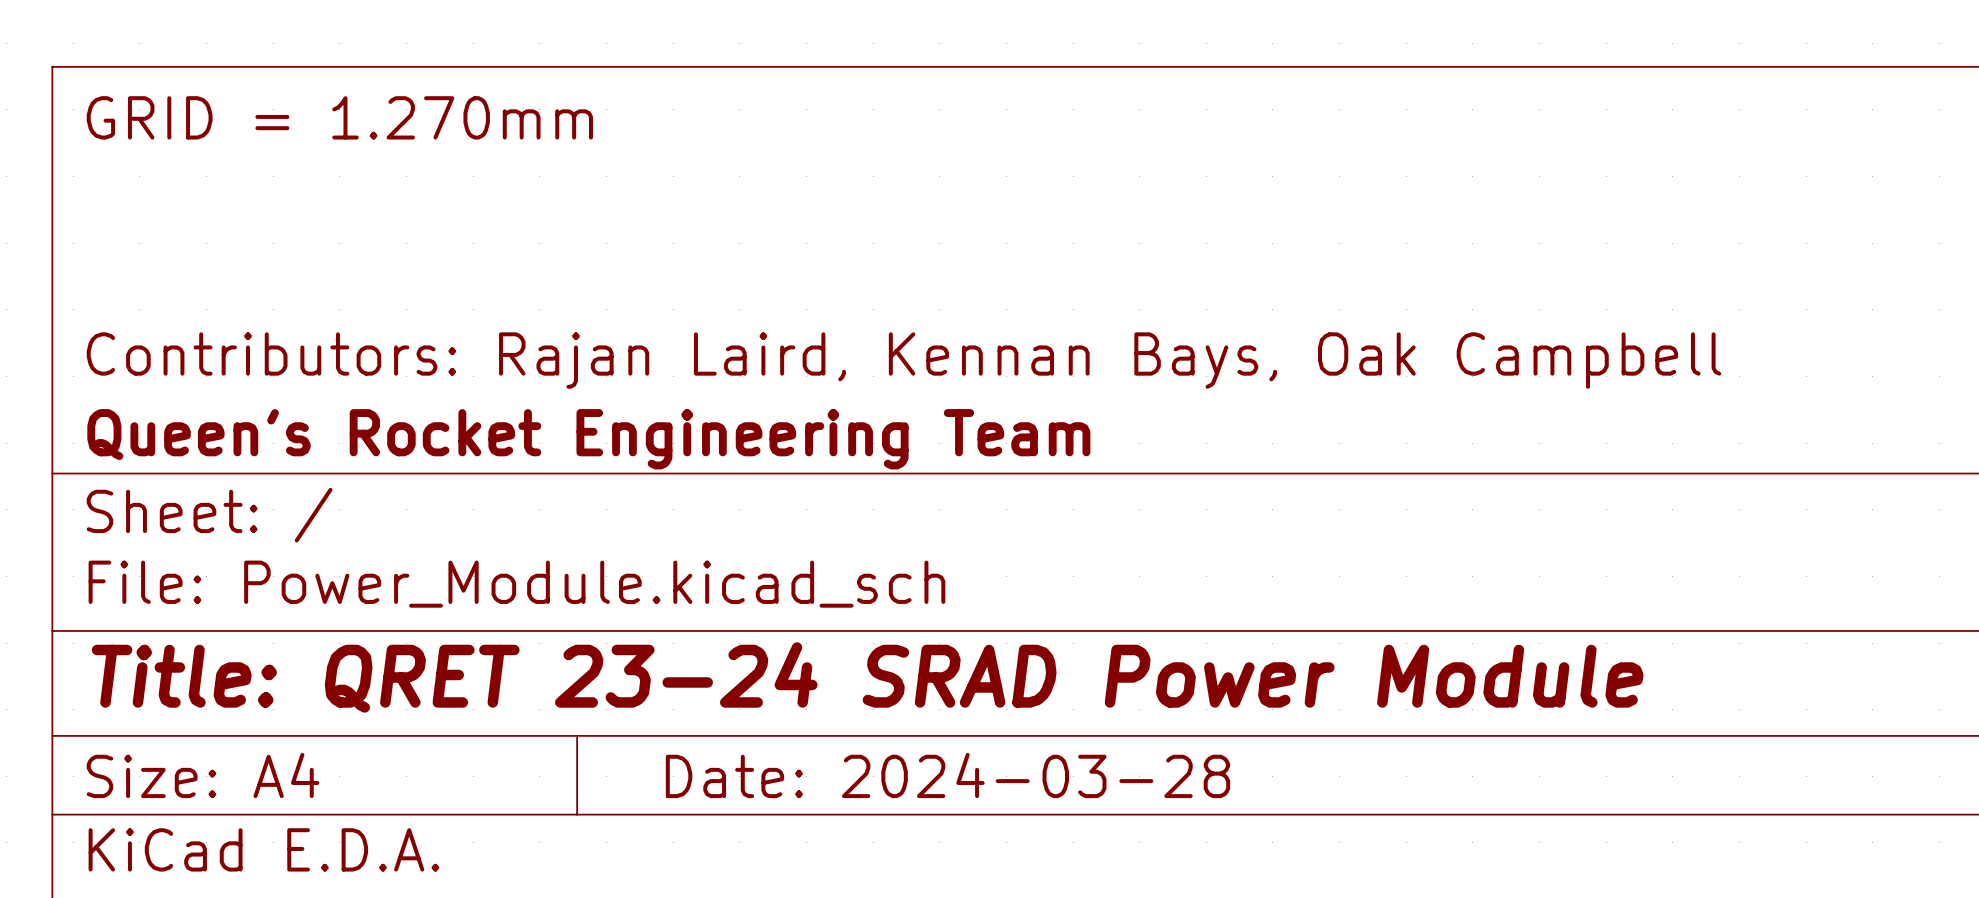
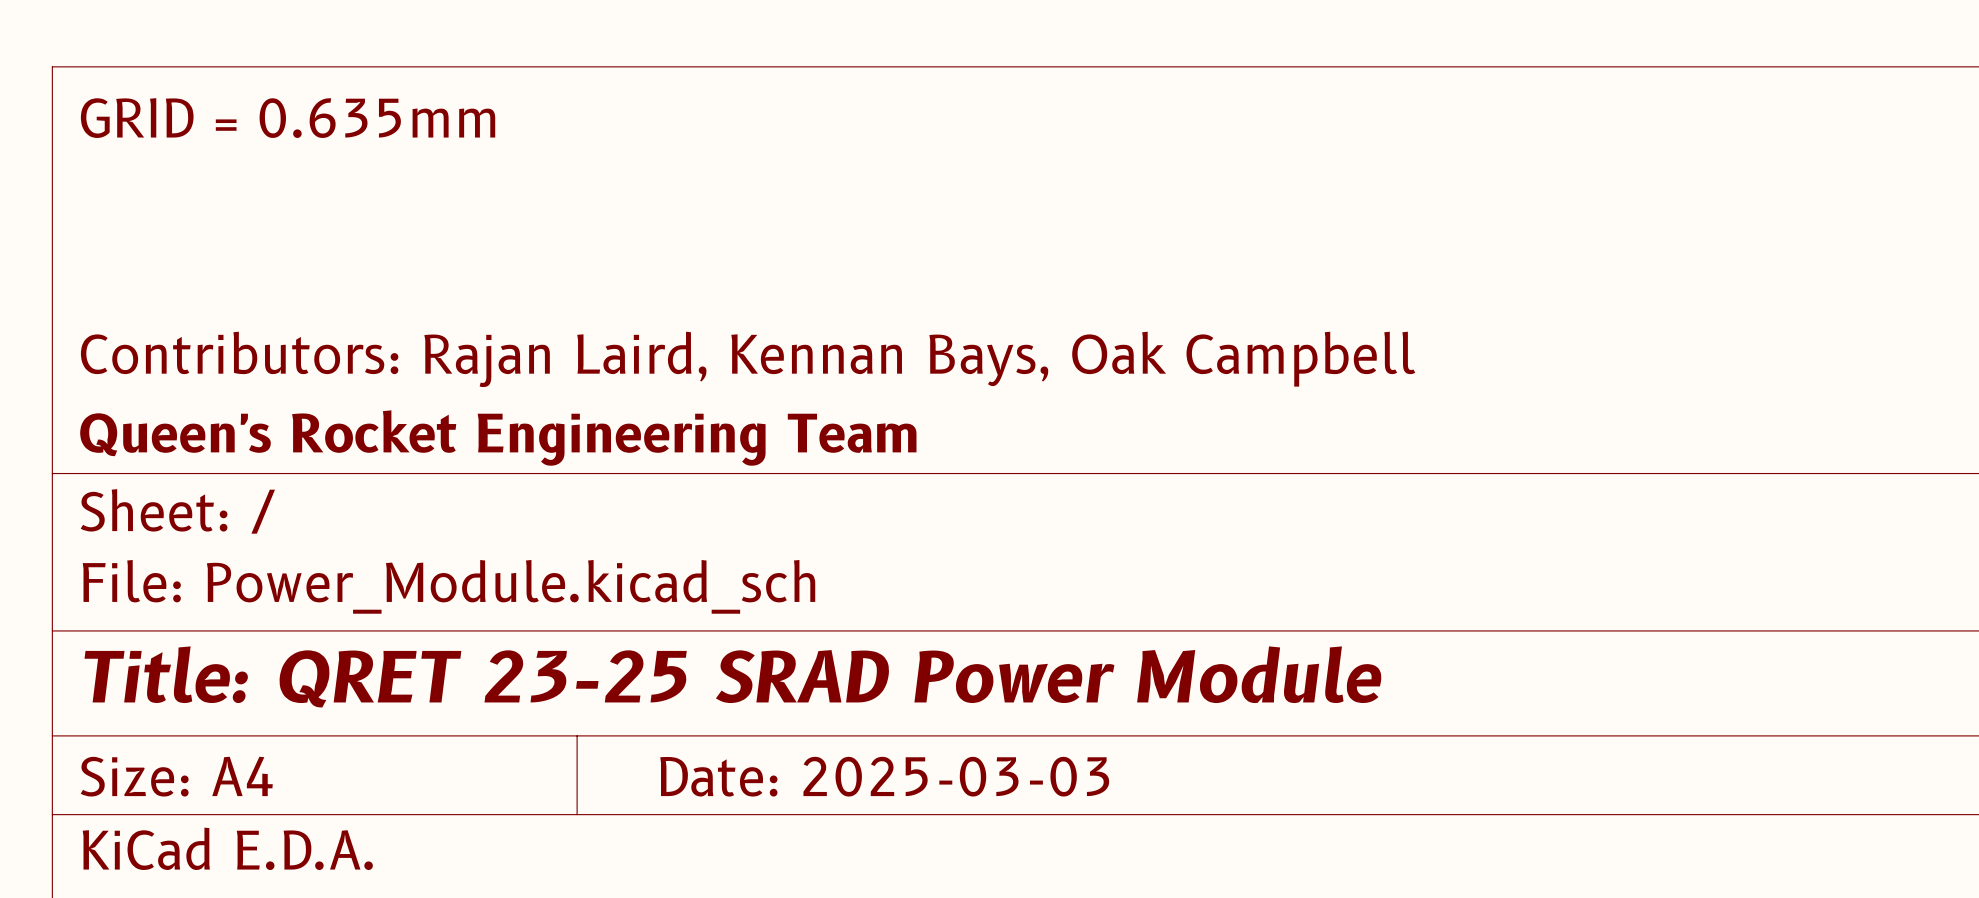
title block: GRID = 1.270mm (339, 117) -> GRID = 0.635mm (288, 118)
title block: Title: QRET 23-24 SRAD Power Module (867, 677) -> Title: QRET 23-25 SRAD Power Module (733, 676)
title block: Date: 2024-03-28 (948, 775) -> Date: 2025-03-03 (884, 776)

